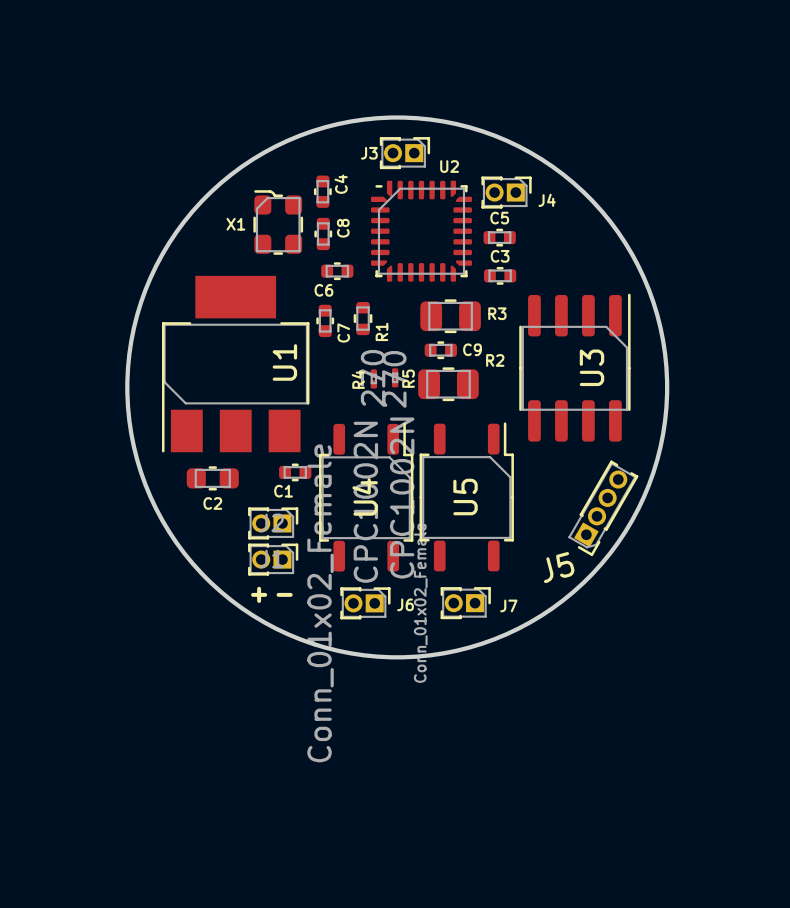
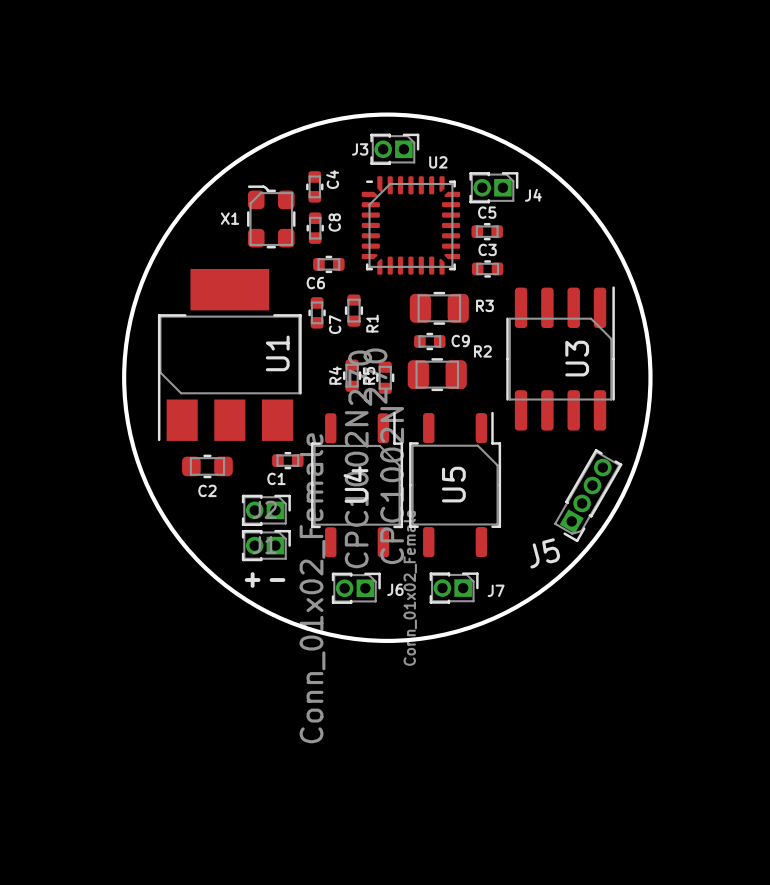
R5 footprint: [391, 368, 399, 388] -> [376, 361, 395, 394]
R4 footprint: [370, 369, 378, 389] -> [342, 359, 362, 392]

